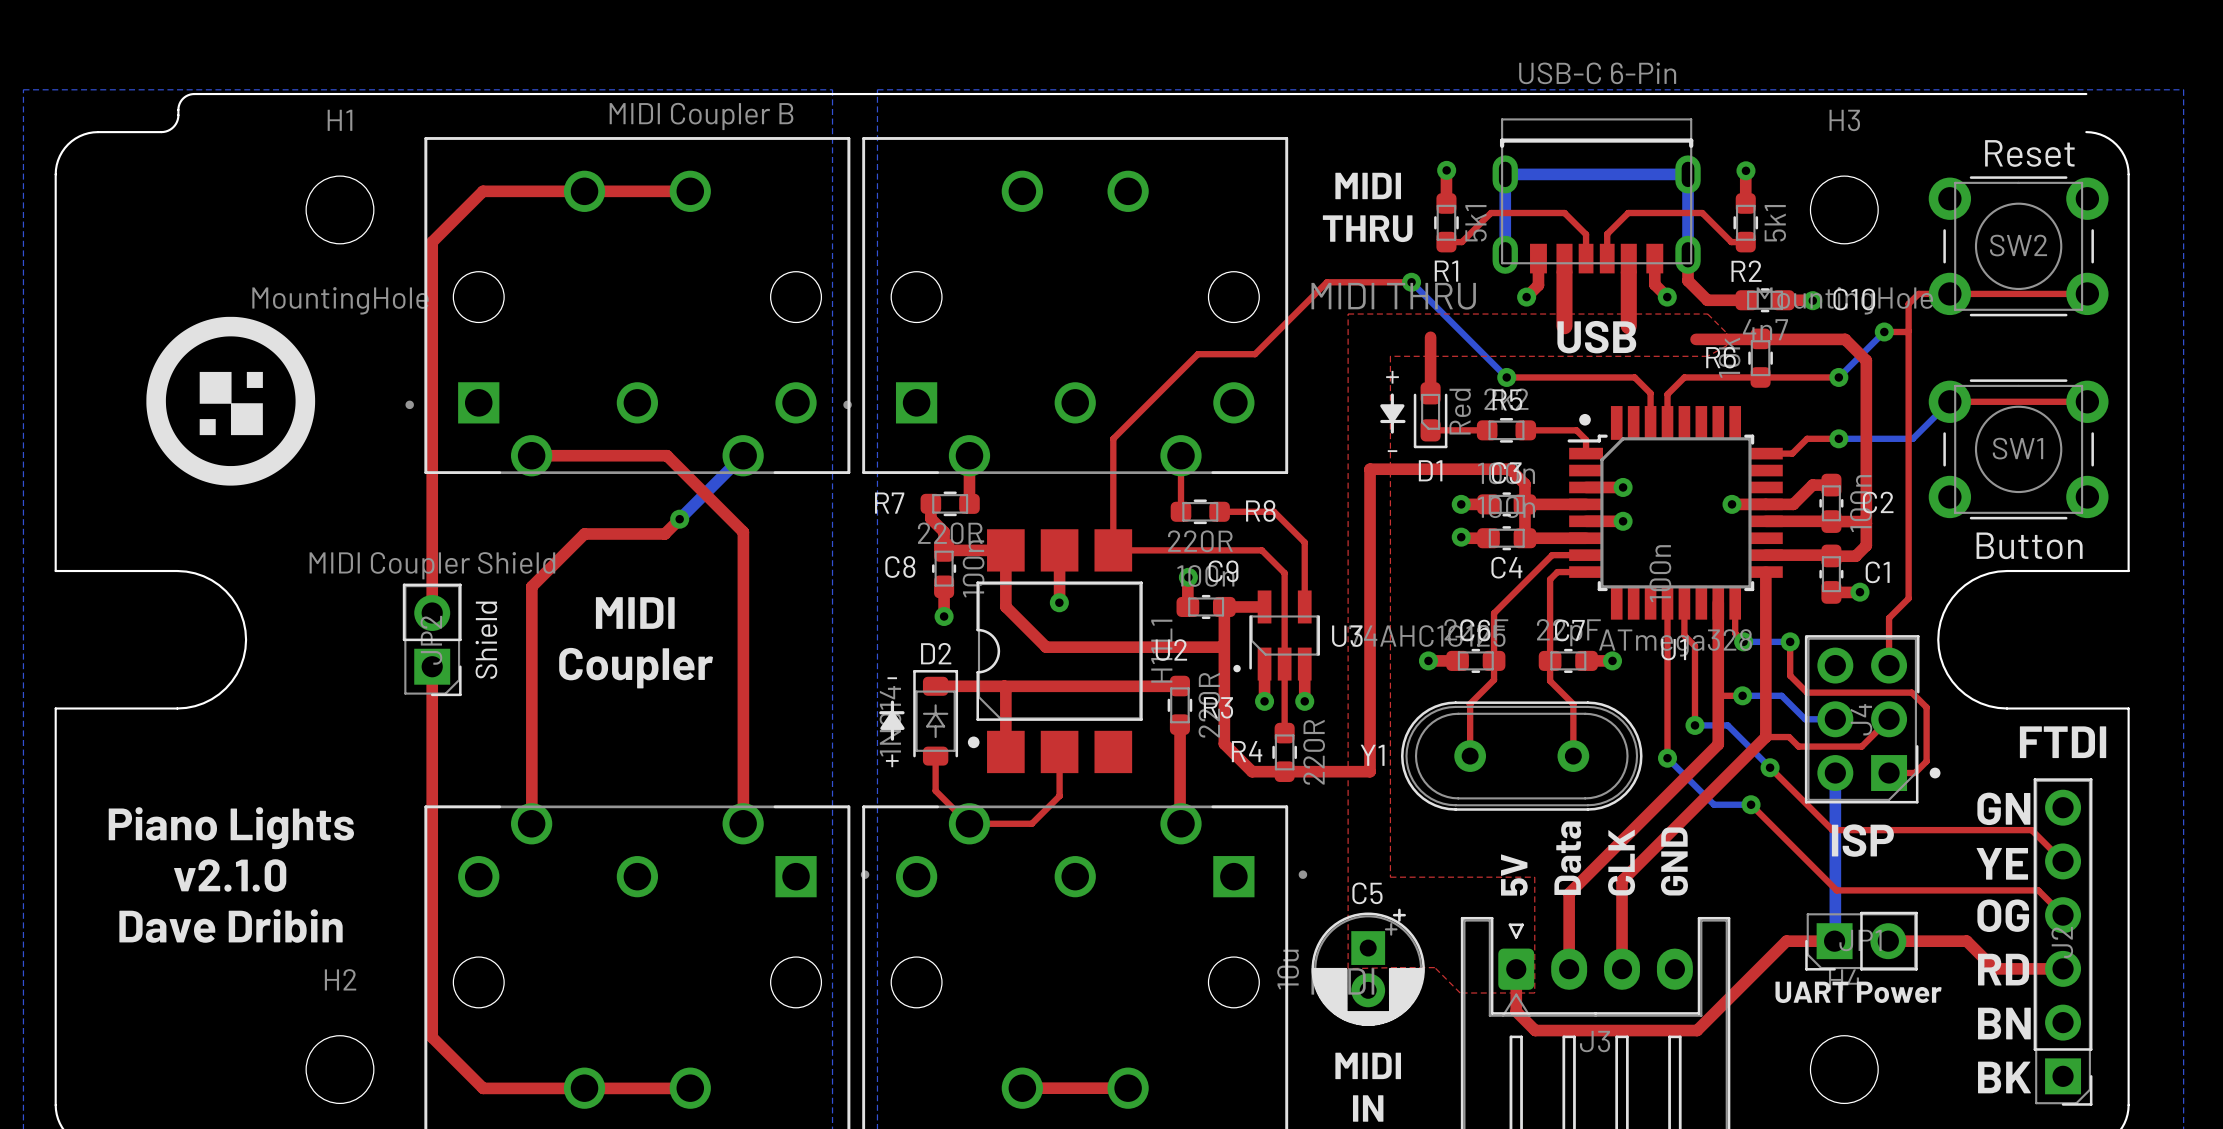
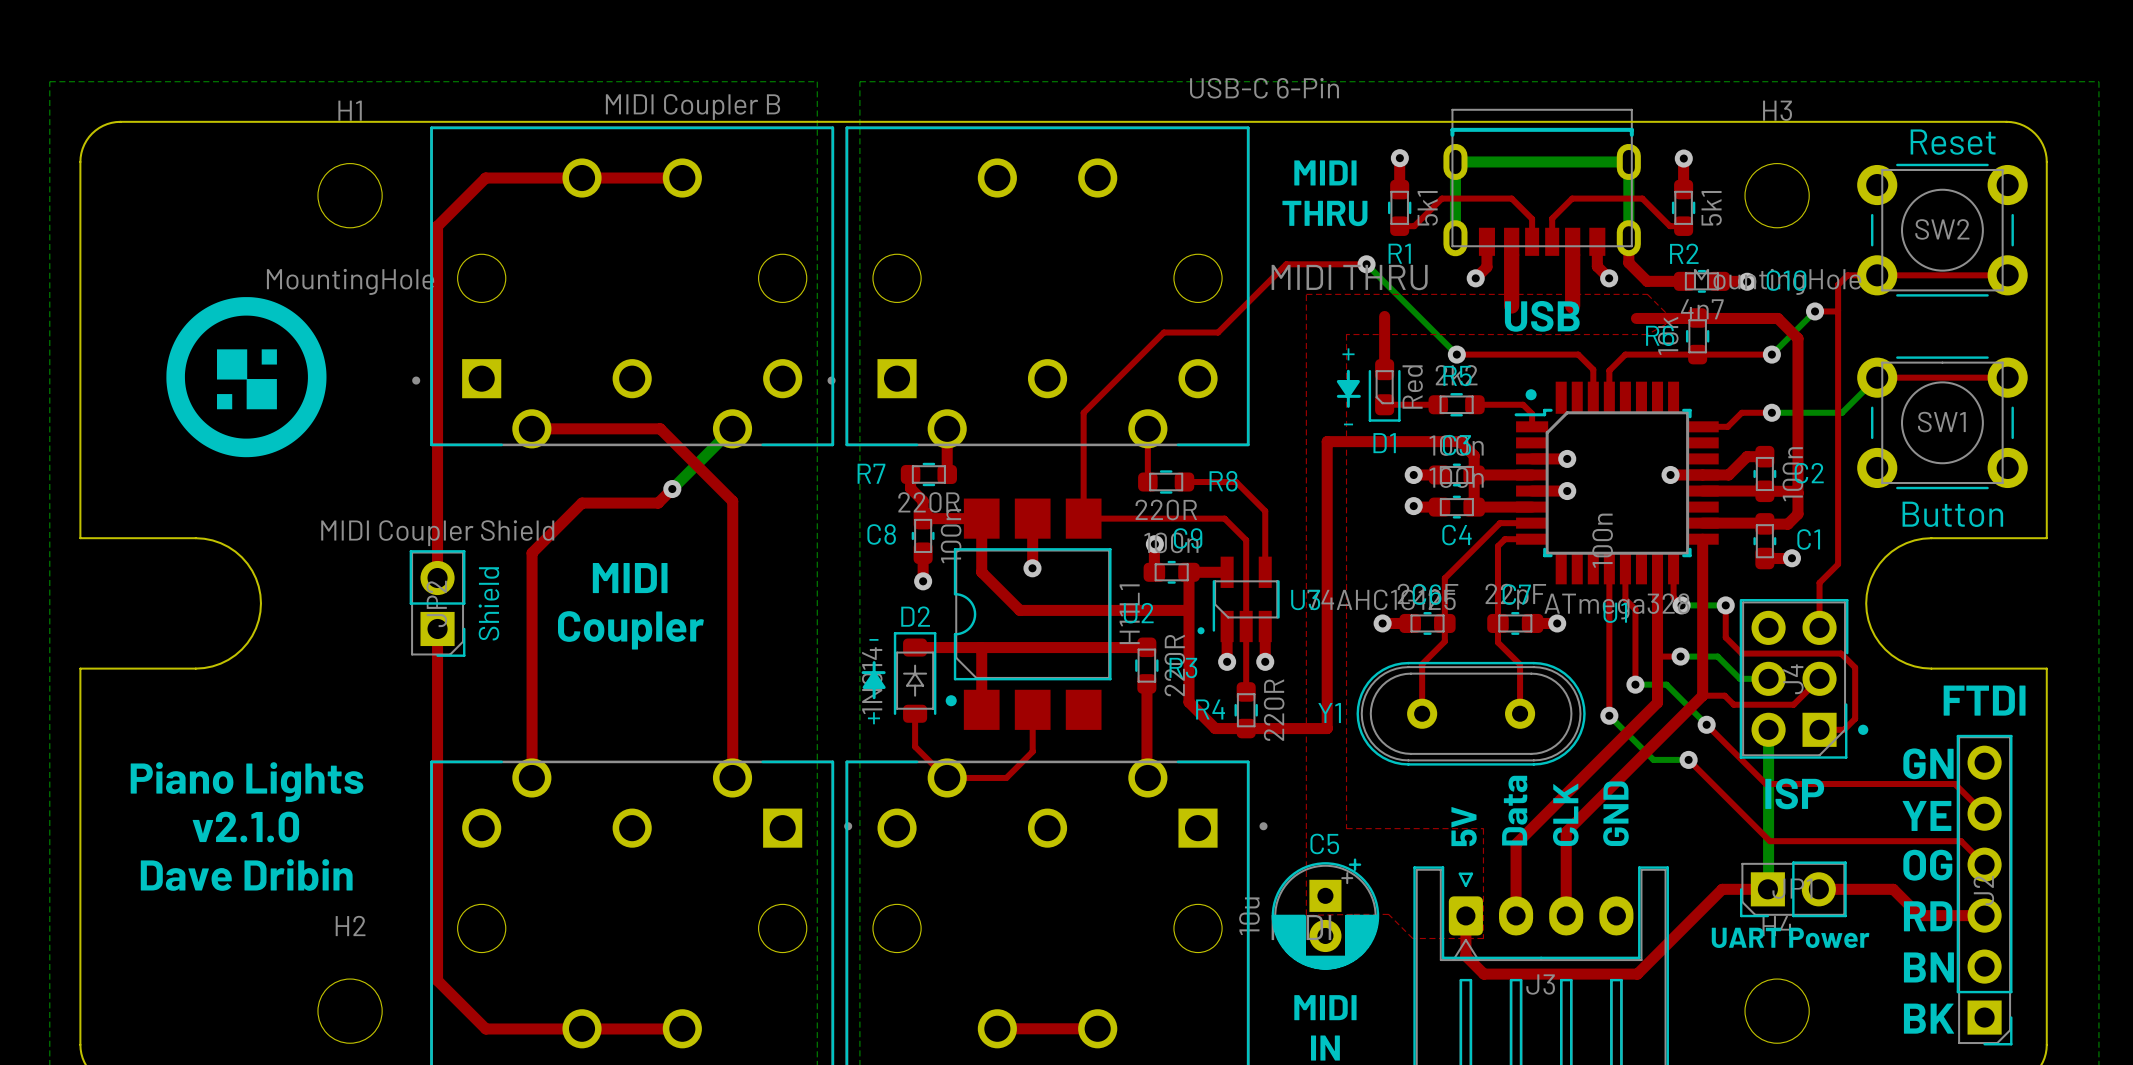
part value position: USB-C 6-Pin (1597, 73) -> USB-C 6-Pin (1264, 88)
board edge: (2086, 94) (194, 94) (186, 96) (180, 101) (174, 125) (169, 129) (161, 132) -> (2006, 121) (180, 121)

